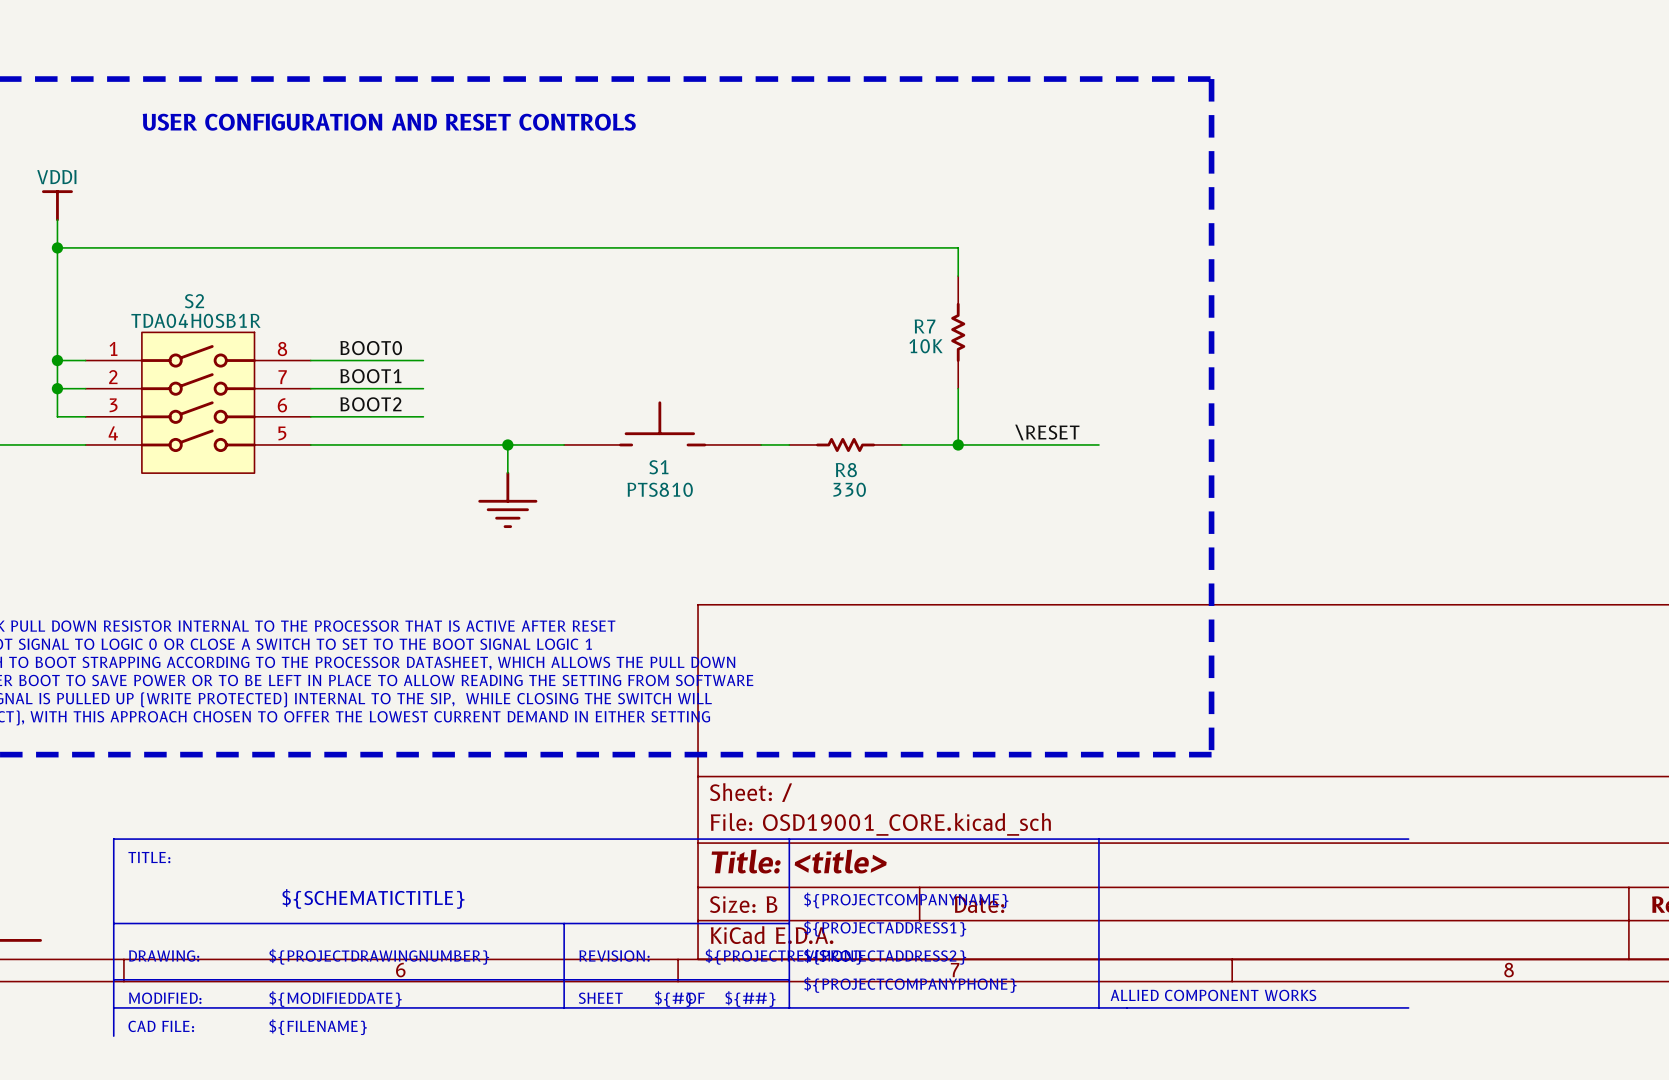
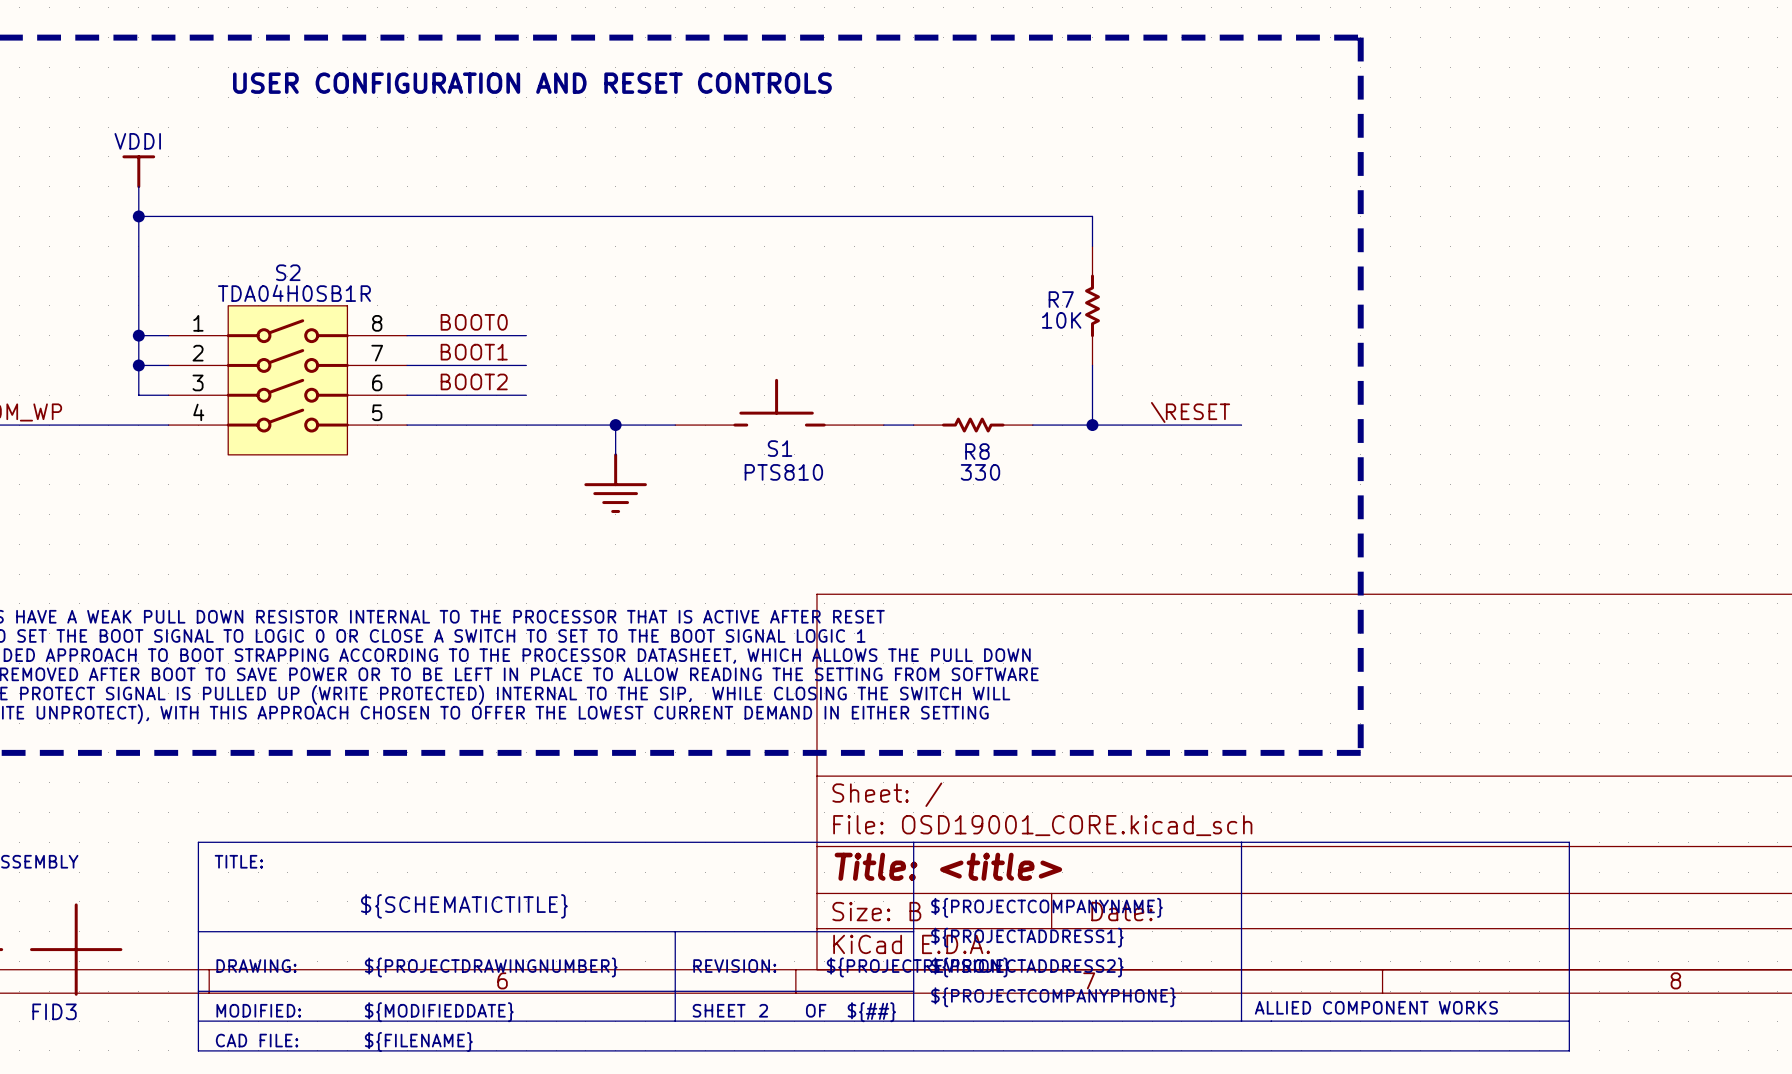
line: none -> (1569, 842) (1569, 1050) (198, 1050)
text: ${#} (673, 999) -> 2 (763, 1010)

